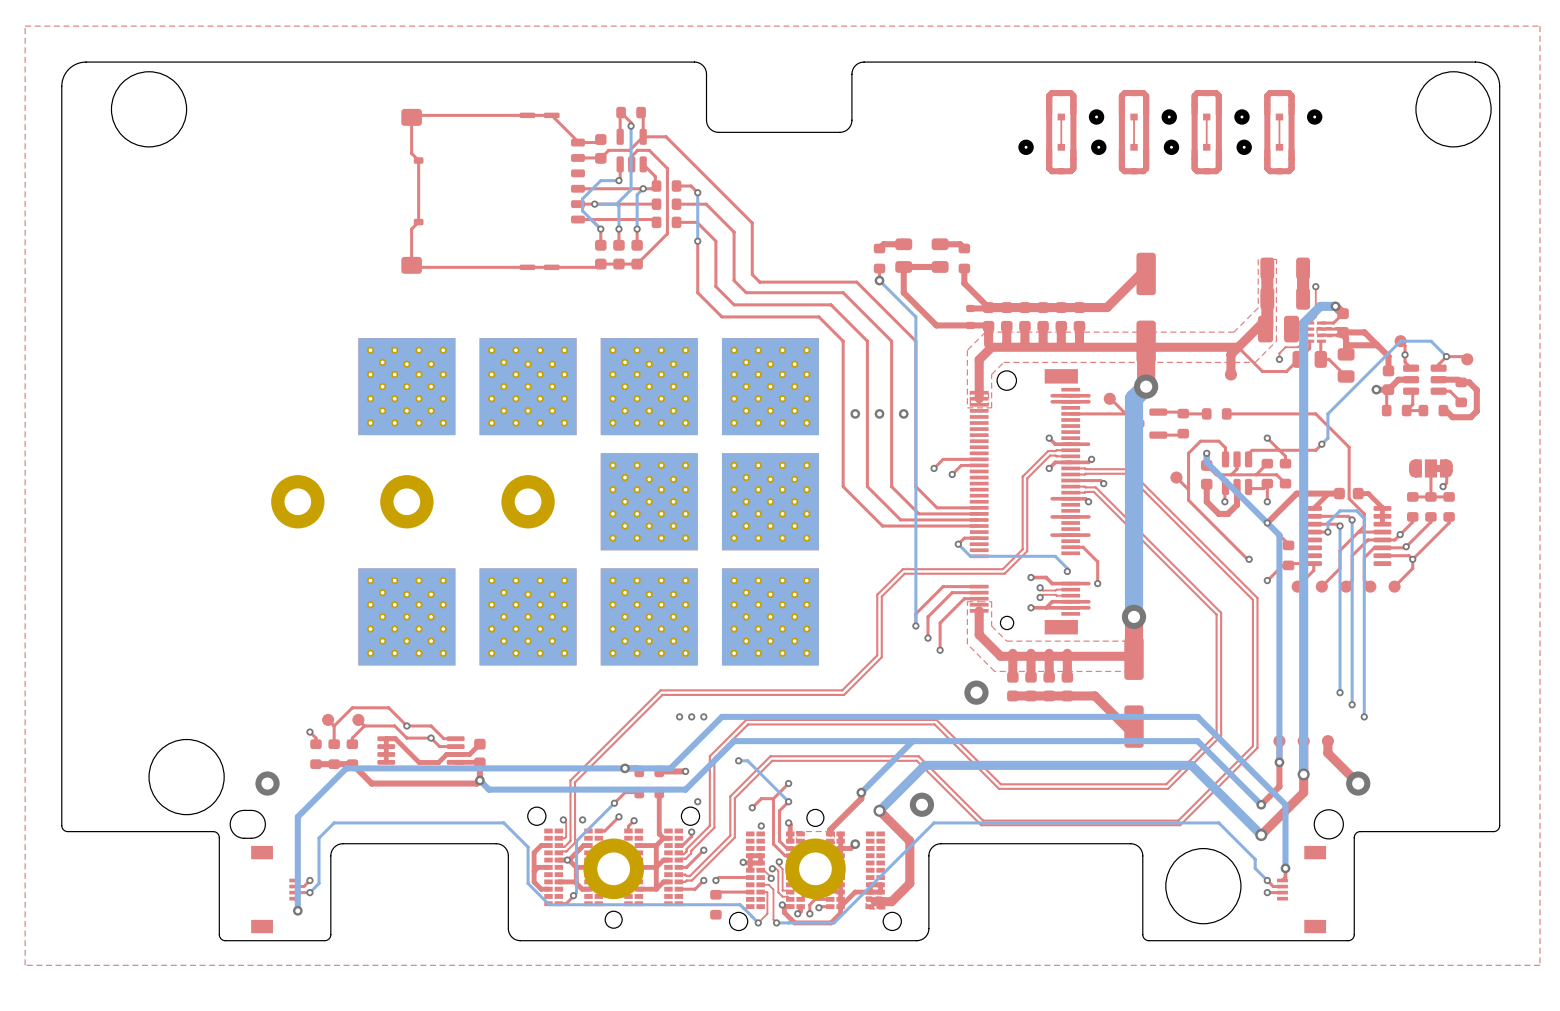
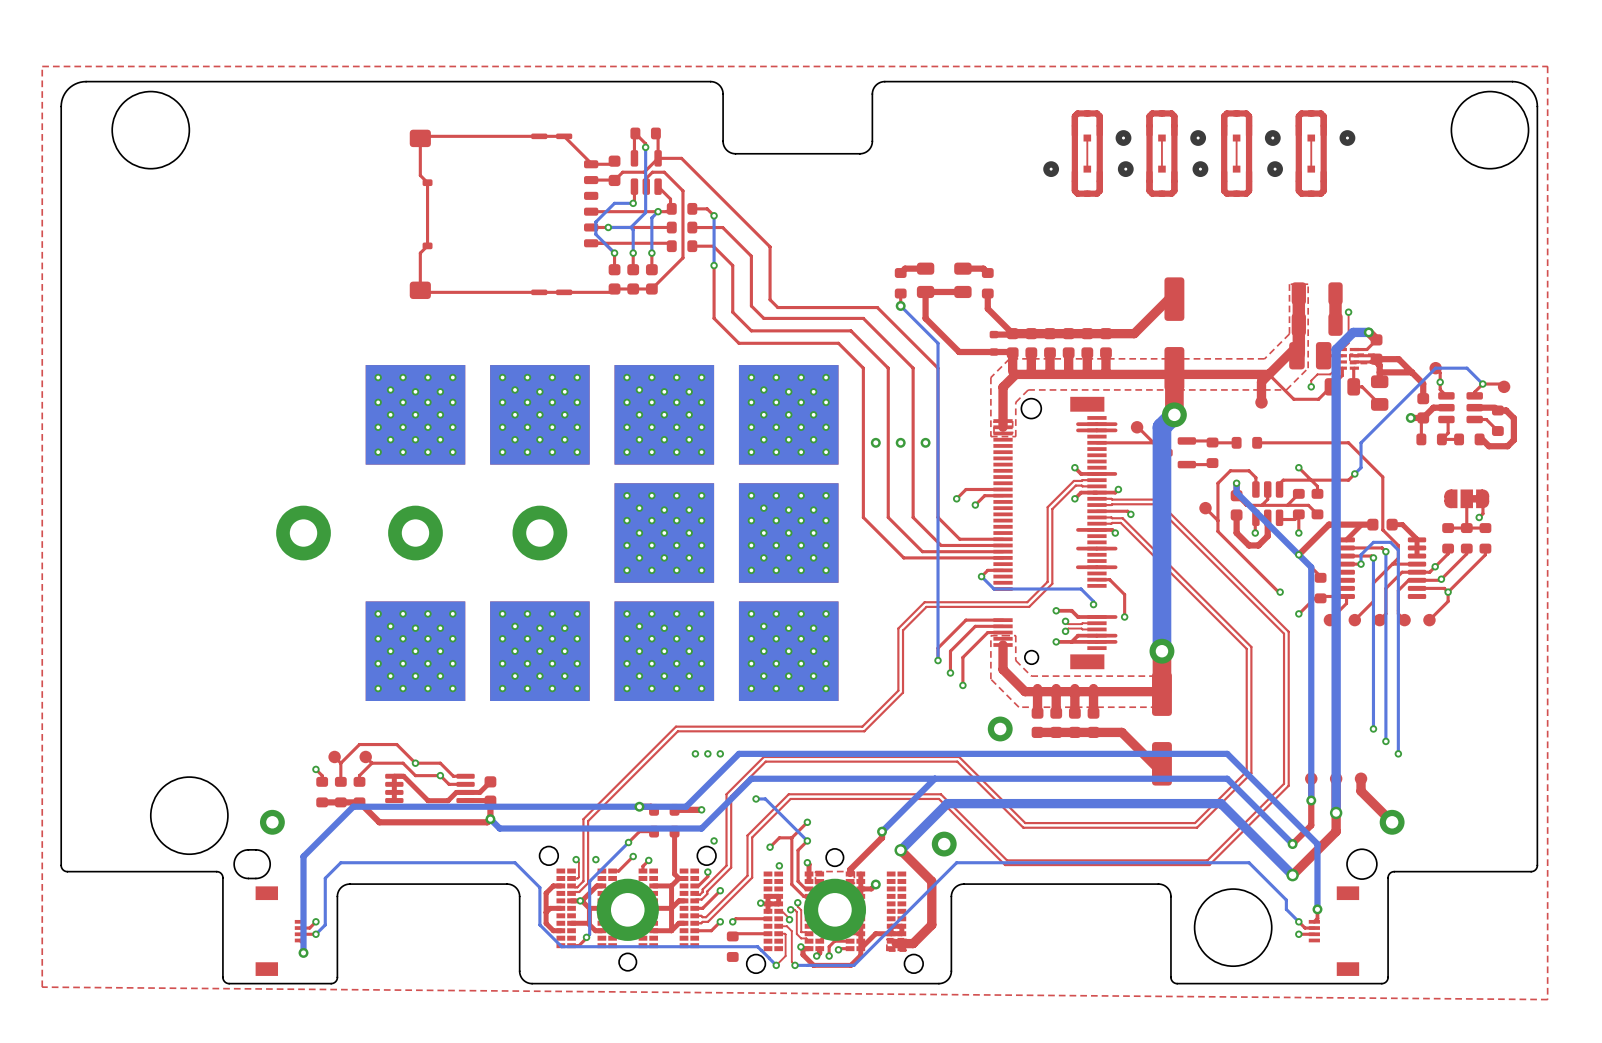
top zone outline: (1540, 26) (25, 26) (25, 965) (1540, 965) (1540, 26) -> (1547, 66) (1547, 999) (42, 987) (42, 66) (1547, 66)

